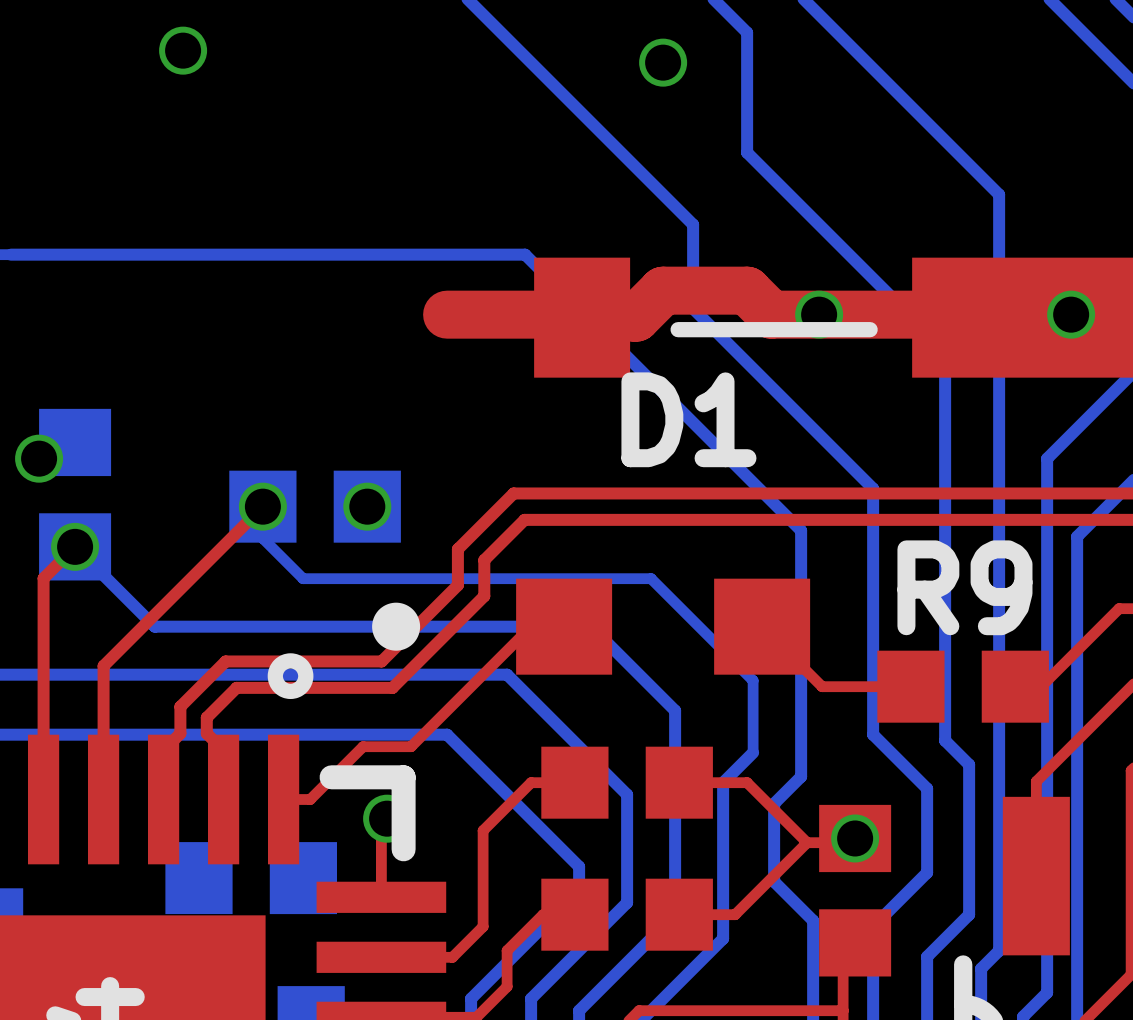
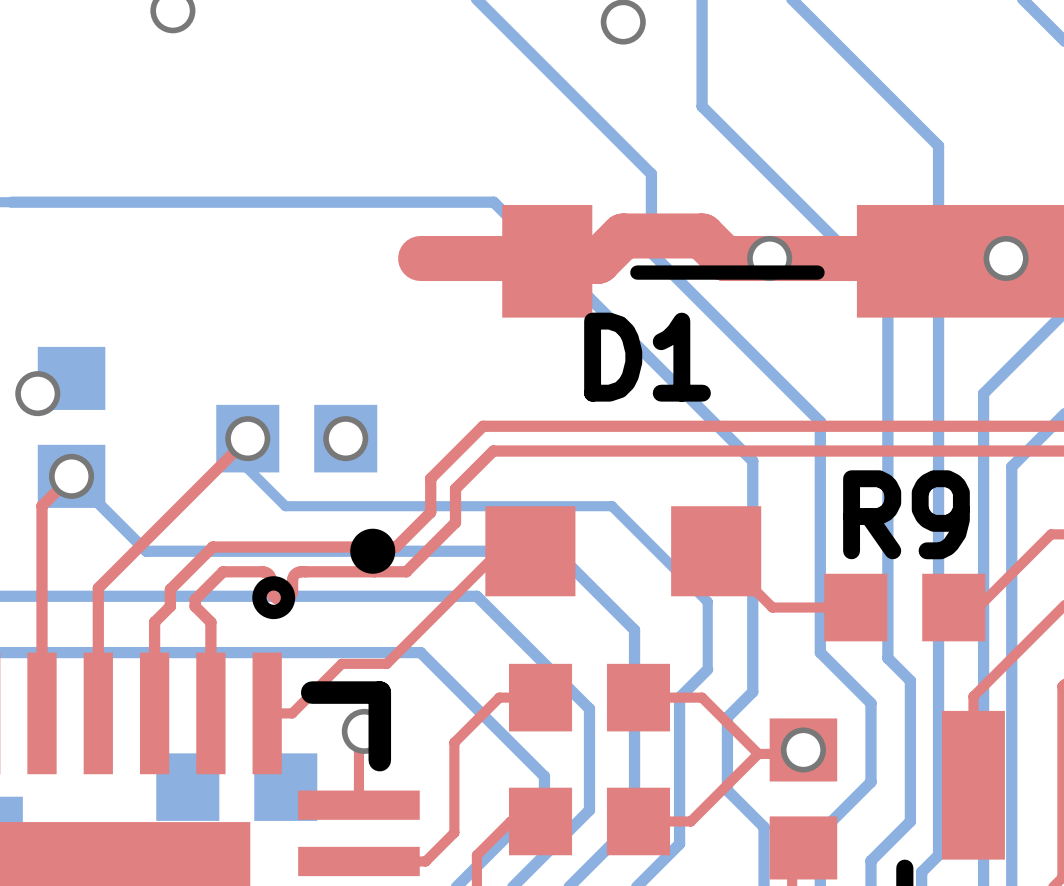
top track: (420, 622) (381, 661) (225, 661) (180, 706) (180, 733) (163, 750) -> (396, 547) (212, 547) (170, 589) (170, 606) (154, 622) (154, 667)
top track: (431, 648) (392, 687) (236, 687) (206, 717) (206, 733) (223, 750) -> (406, 571) (298, 572) (292, 578) (291, 594) (284, 599) (277, 598) (272, 595) (270, 578) (265, 572) (223, 571) (195, 599) (195, 606) (210, 622) (210, 667)

